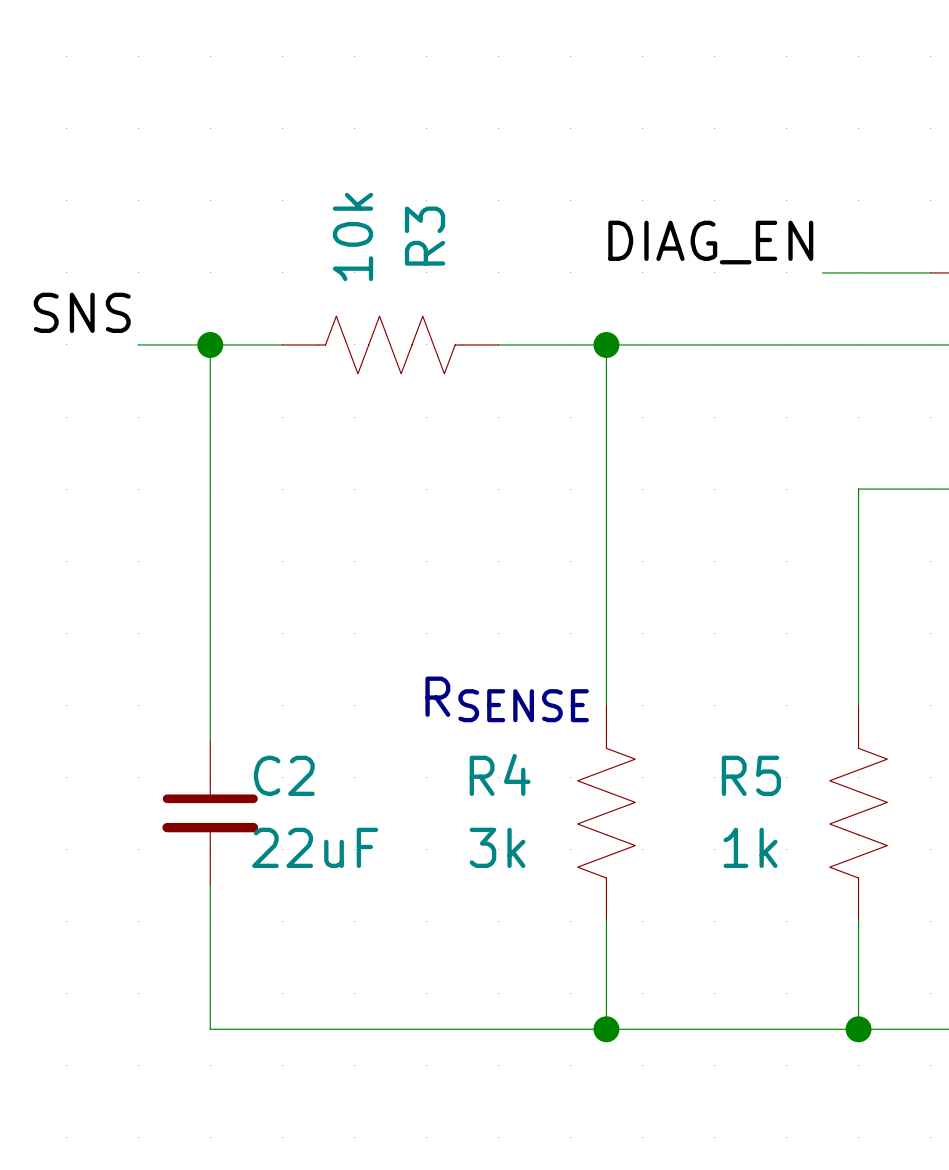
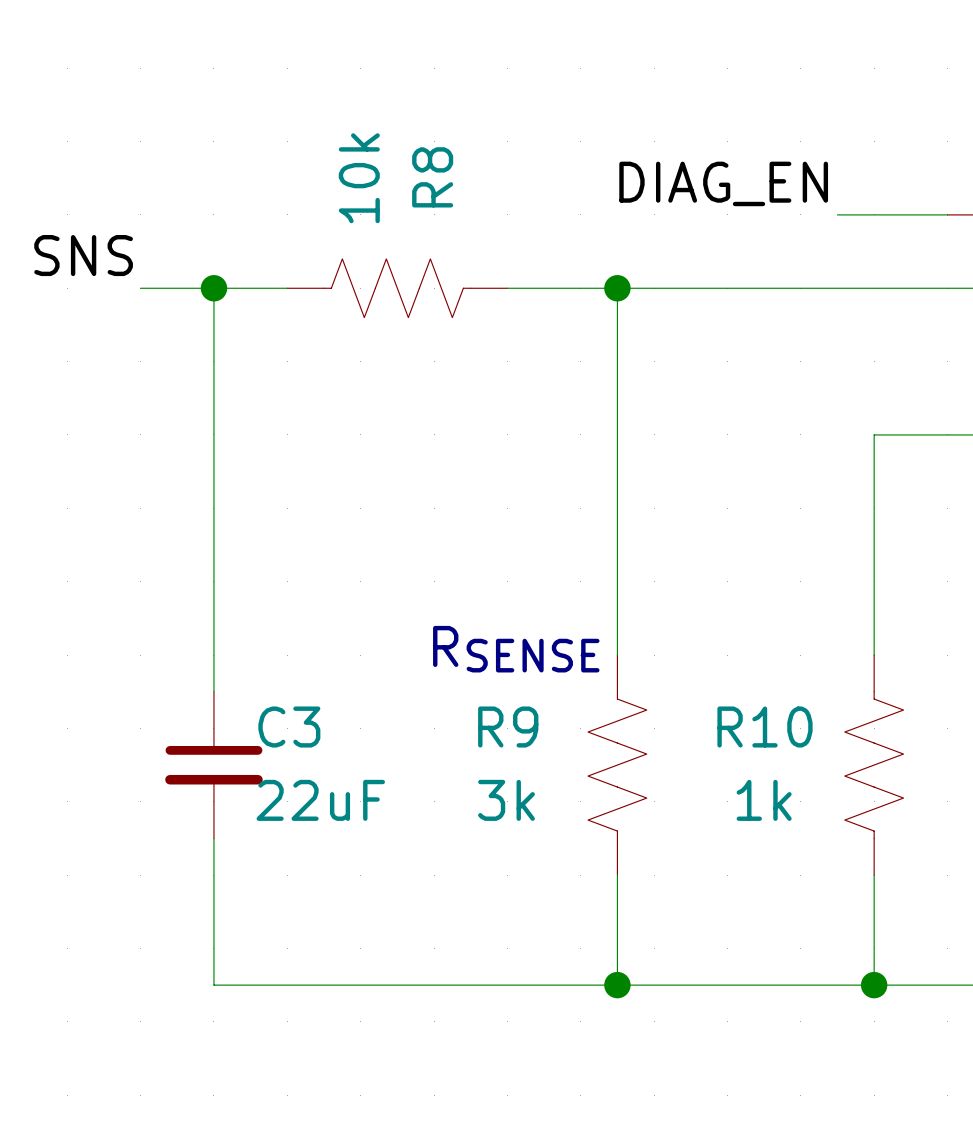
R3 name: R3 (425, 236) -> R8 (432, 177)
R4 name: R4 (500, 774) -> R9 (508, 727)
C2 name: C2 (284, 775) -> C3 (289, 727)
R5 name: R5 (751, 775) -> R10 (764, 727)

